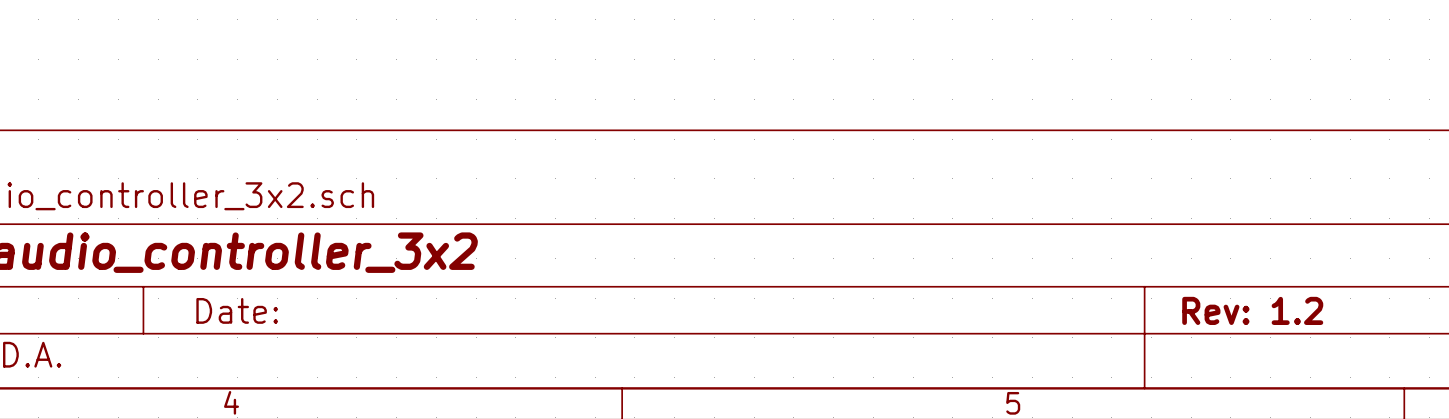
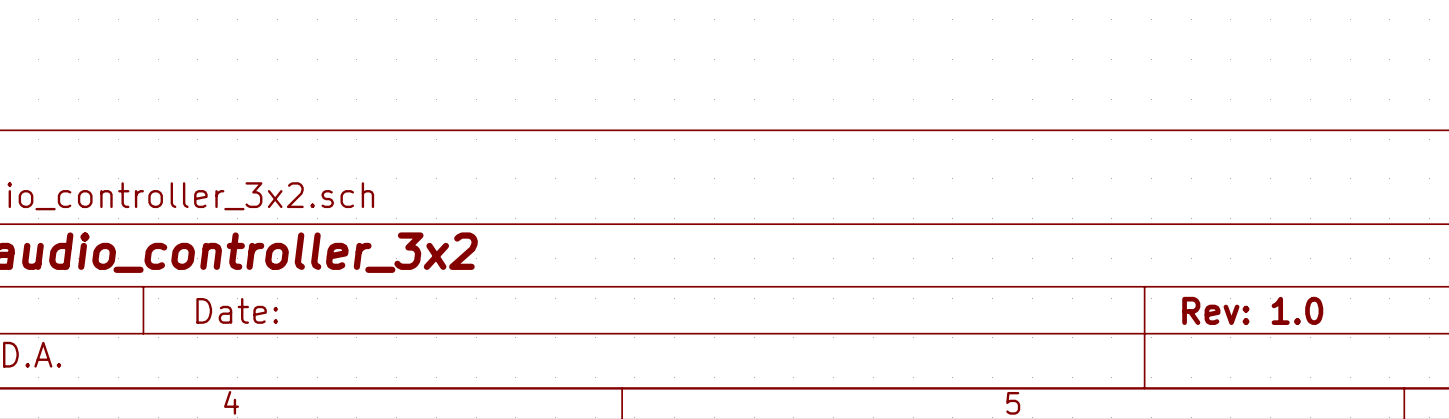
title block: Rev: 1.2 (1252, 310) -> Rev: 1.0 (1252, 310)

